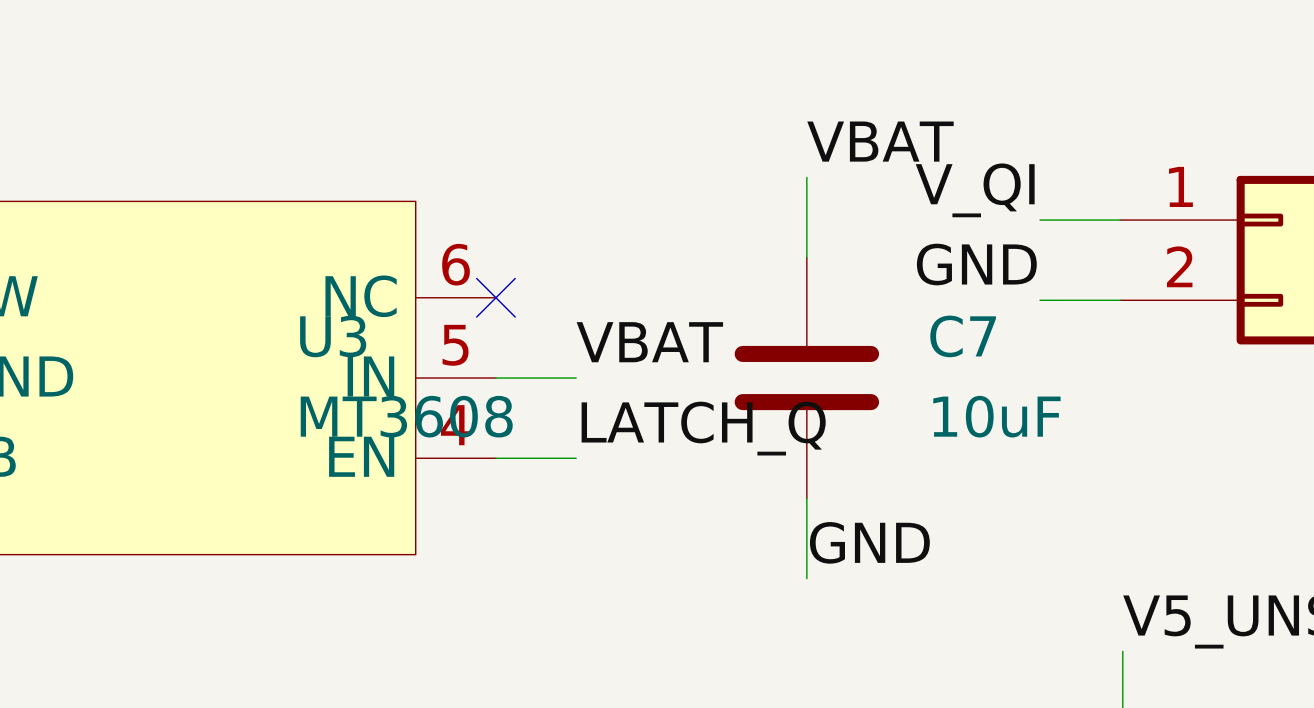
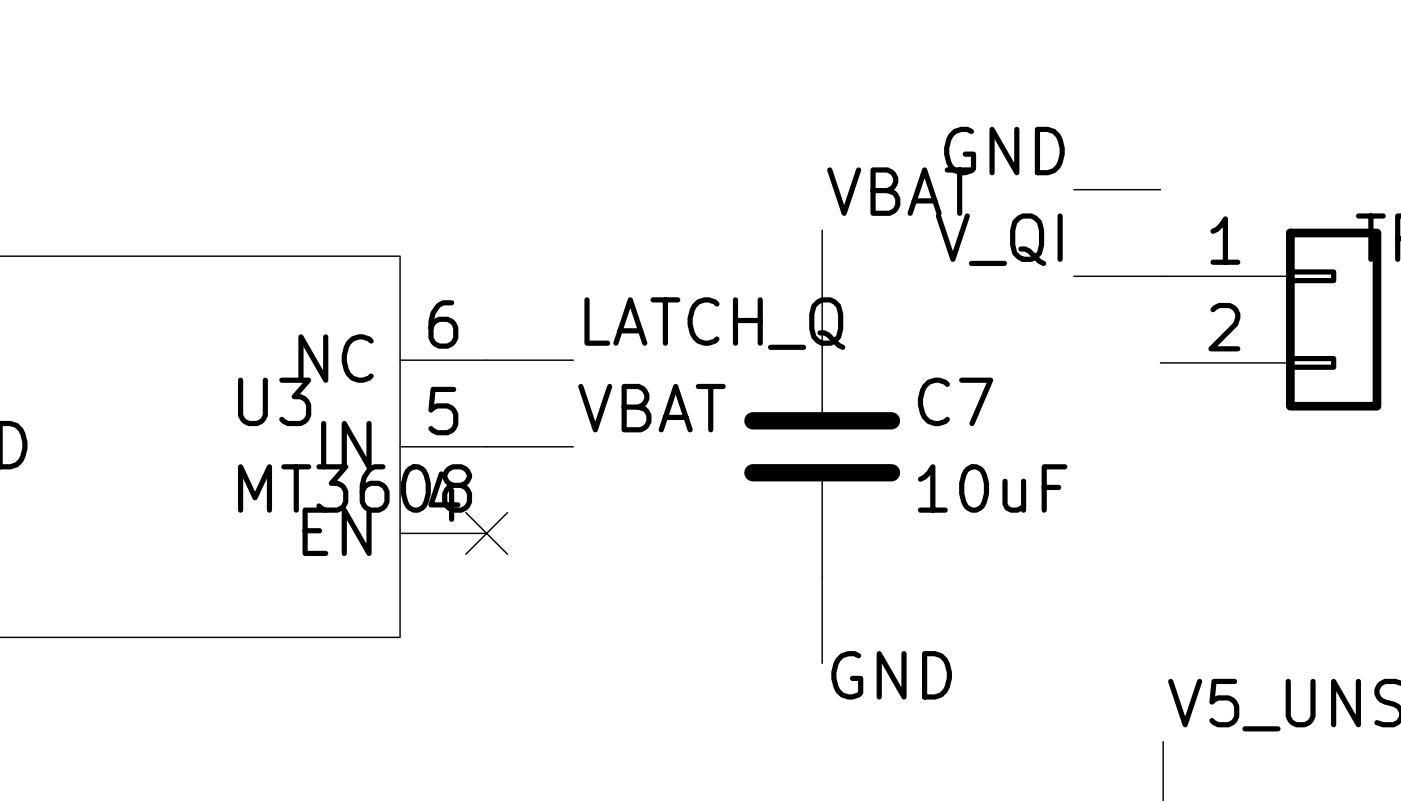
label position: GND (976, 264) -> GND (1004, 151)
no-connect mark position: (495, 297) -> (486, 533)
wire: (1040, 300) (1120, 300) -> (1073, 189) (1160, 189)
U3 name position: U3 (333, 336) -> U3 (274, 401)
C7 name position: C7 (963, 336) -> C7 (955, 401)
U3 value position: MT3608 (406, 416) -> MT3608 (355, 488)
C7 value position: 10uF (996, 416) -> 10uF (992, 488)
label position: LATCH_Q (703, 428) -> LATCH_Q (714, 323)
wire: (495, 458) (576, 458) -> (486, 360) (573, 360)
label position: GND (869, 542) -> GND (891, 675)

